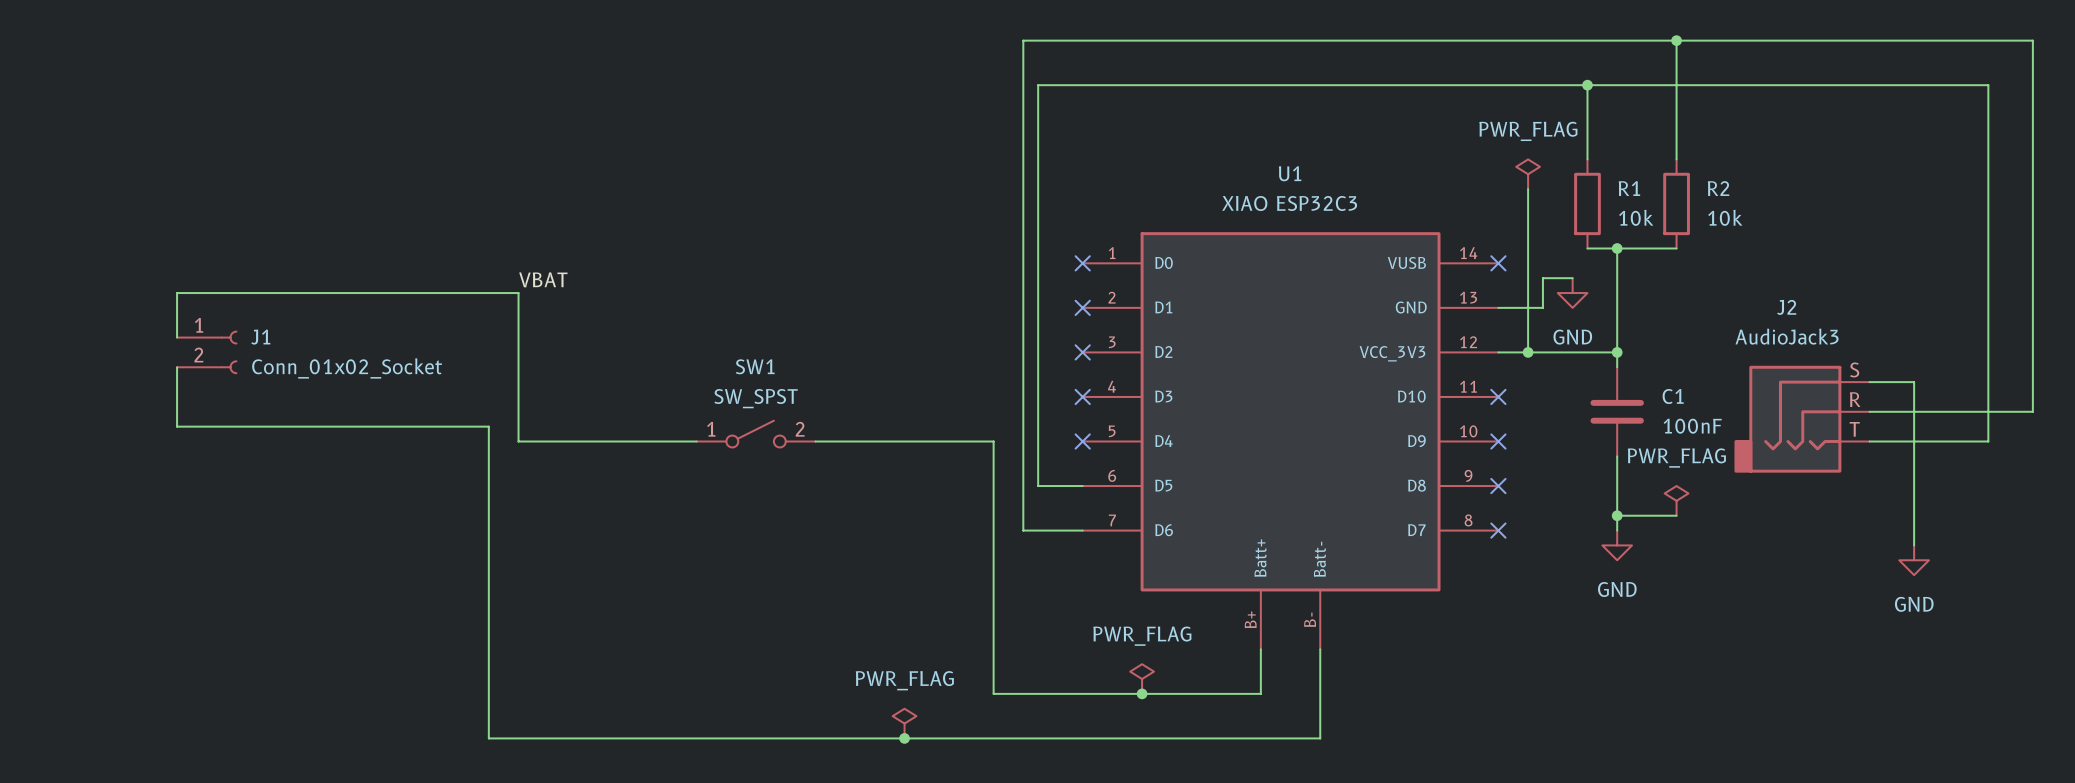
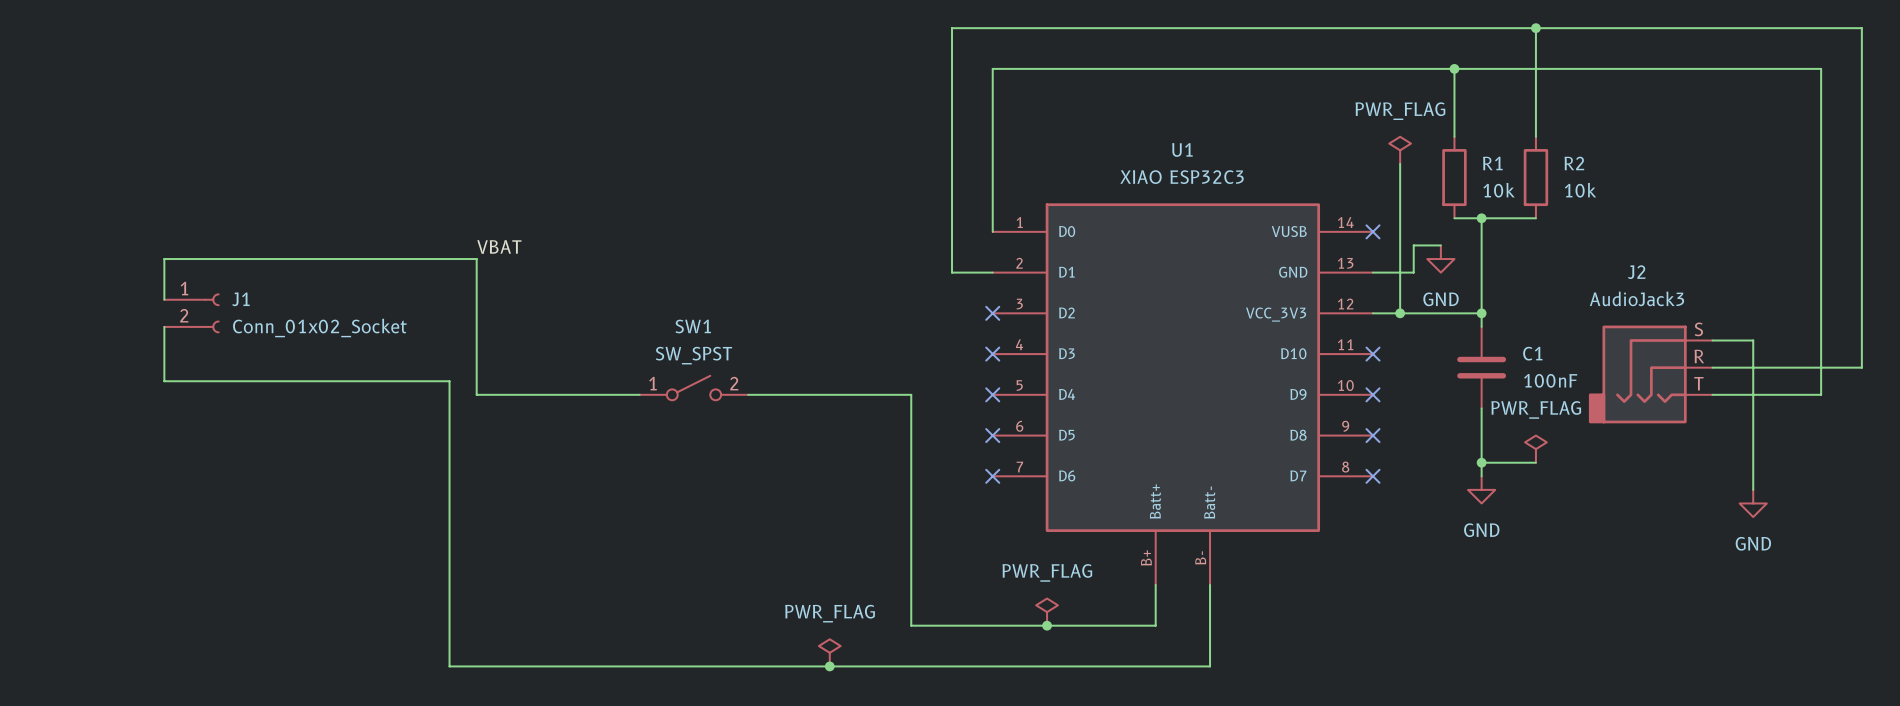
wire: (1038, 40) (1023, 40) (1023, 530) (1082, 530) -> none
wire: (1038, 85) (1082, 85) -> (952, 68) (952, 28)
wire: none -> (992, 68) (992, 231)
no-connect mark: (1082, 263) -> none
wire: (1038, 307) (1038, 486) (1082, 486) -> (952, 272) (992, 272)
no-connect mark: (1082, 307) -> none
no-connect mark: none -> (992, 435)
no-connect mark: none -> (992, 476)

